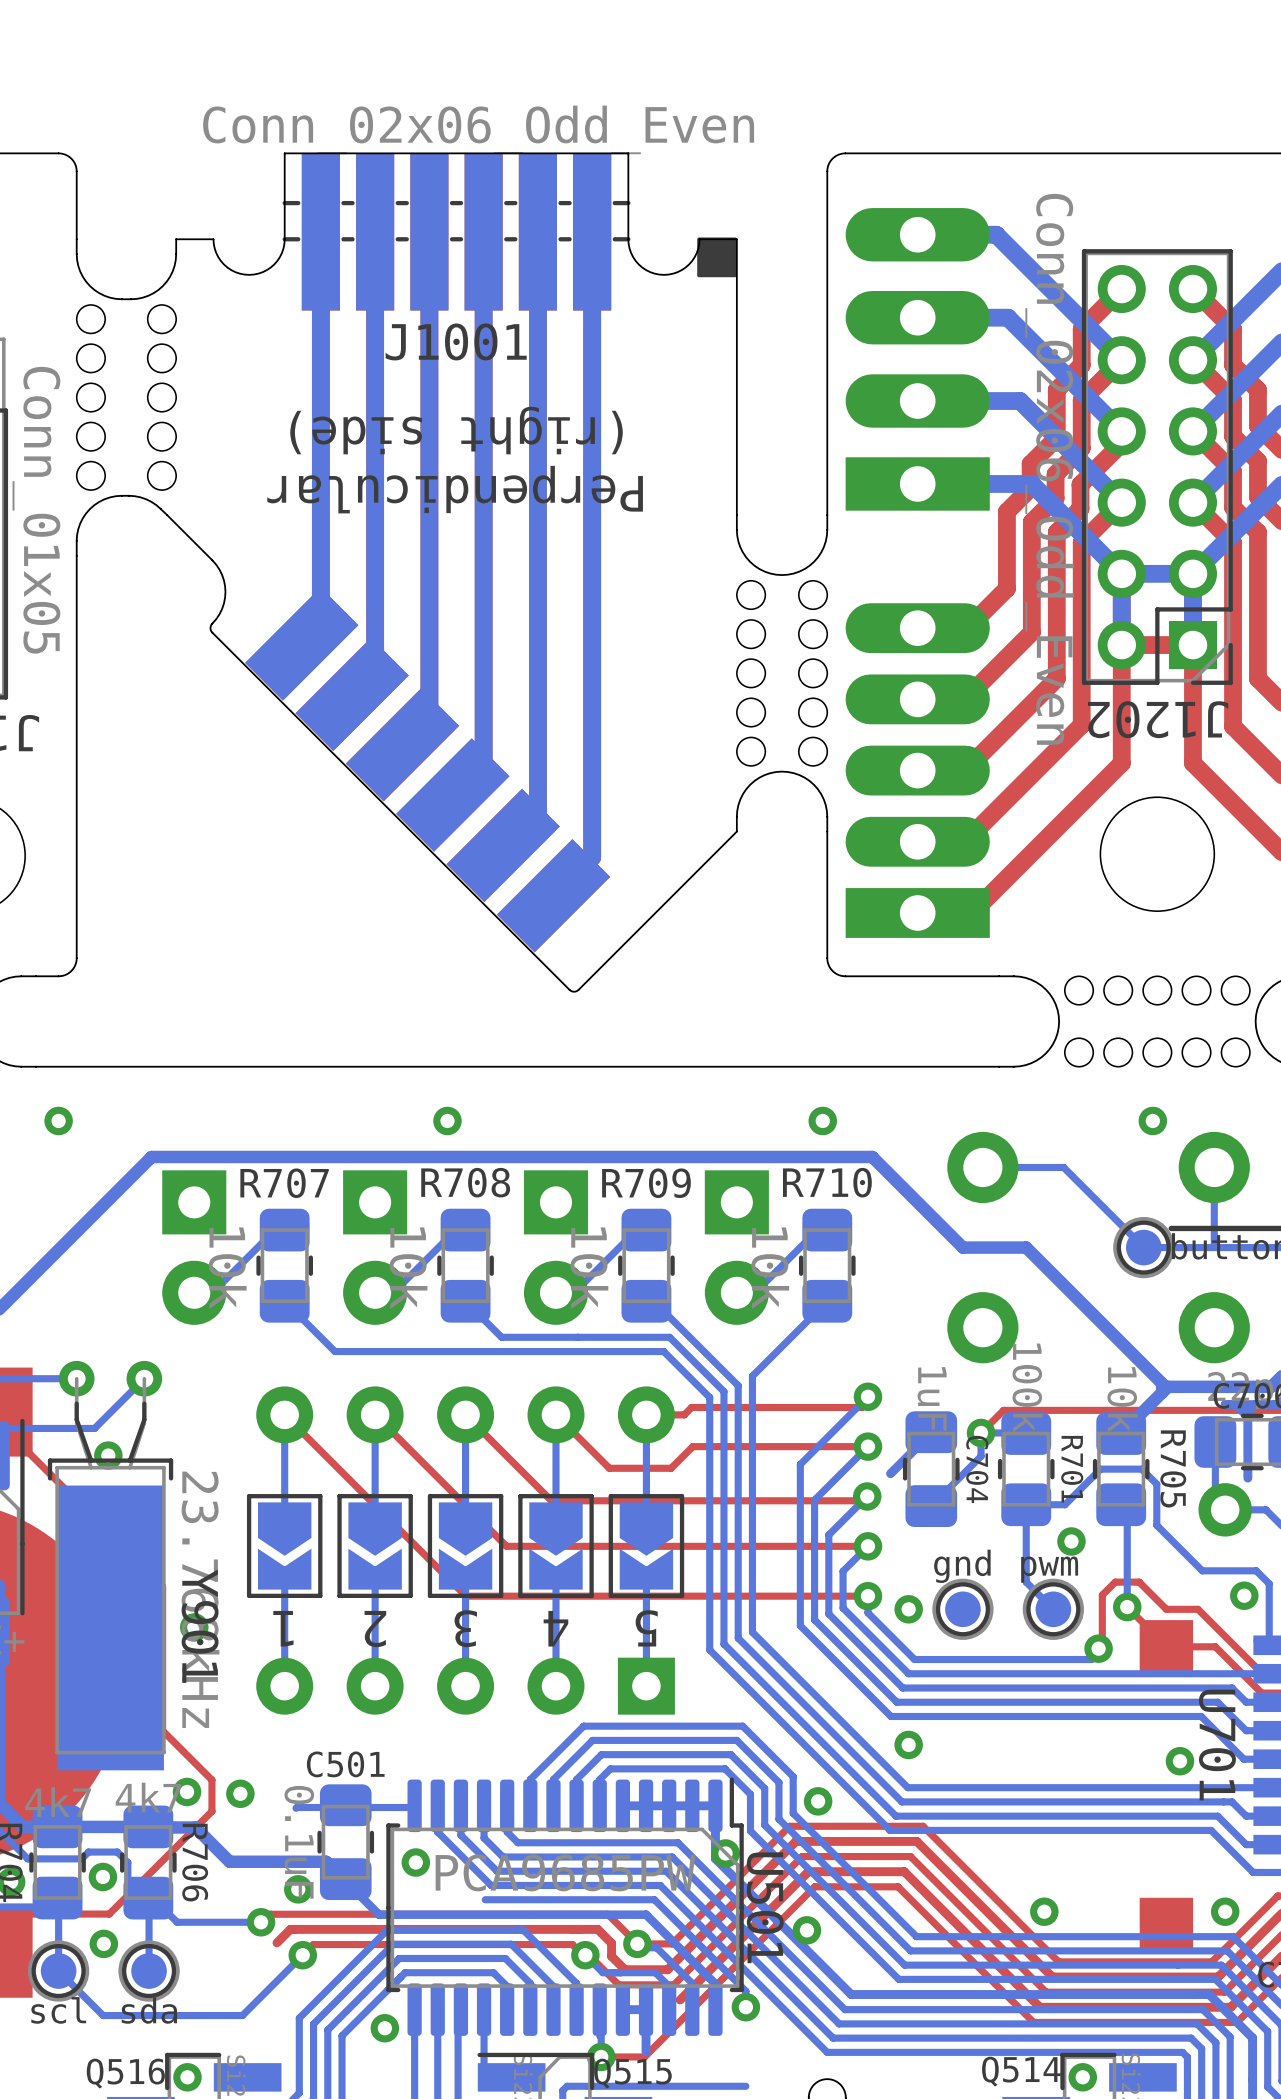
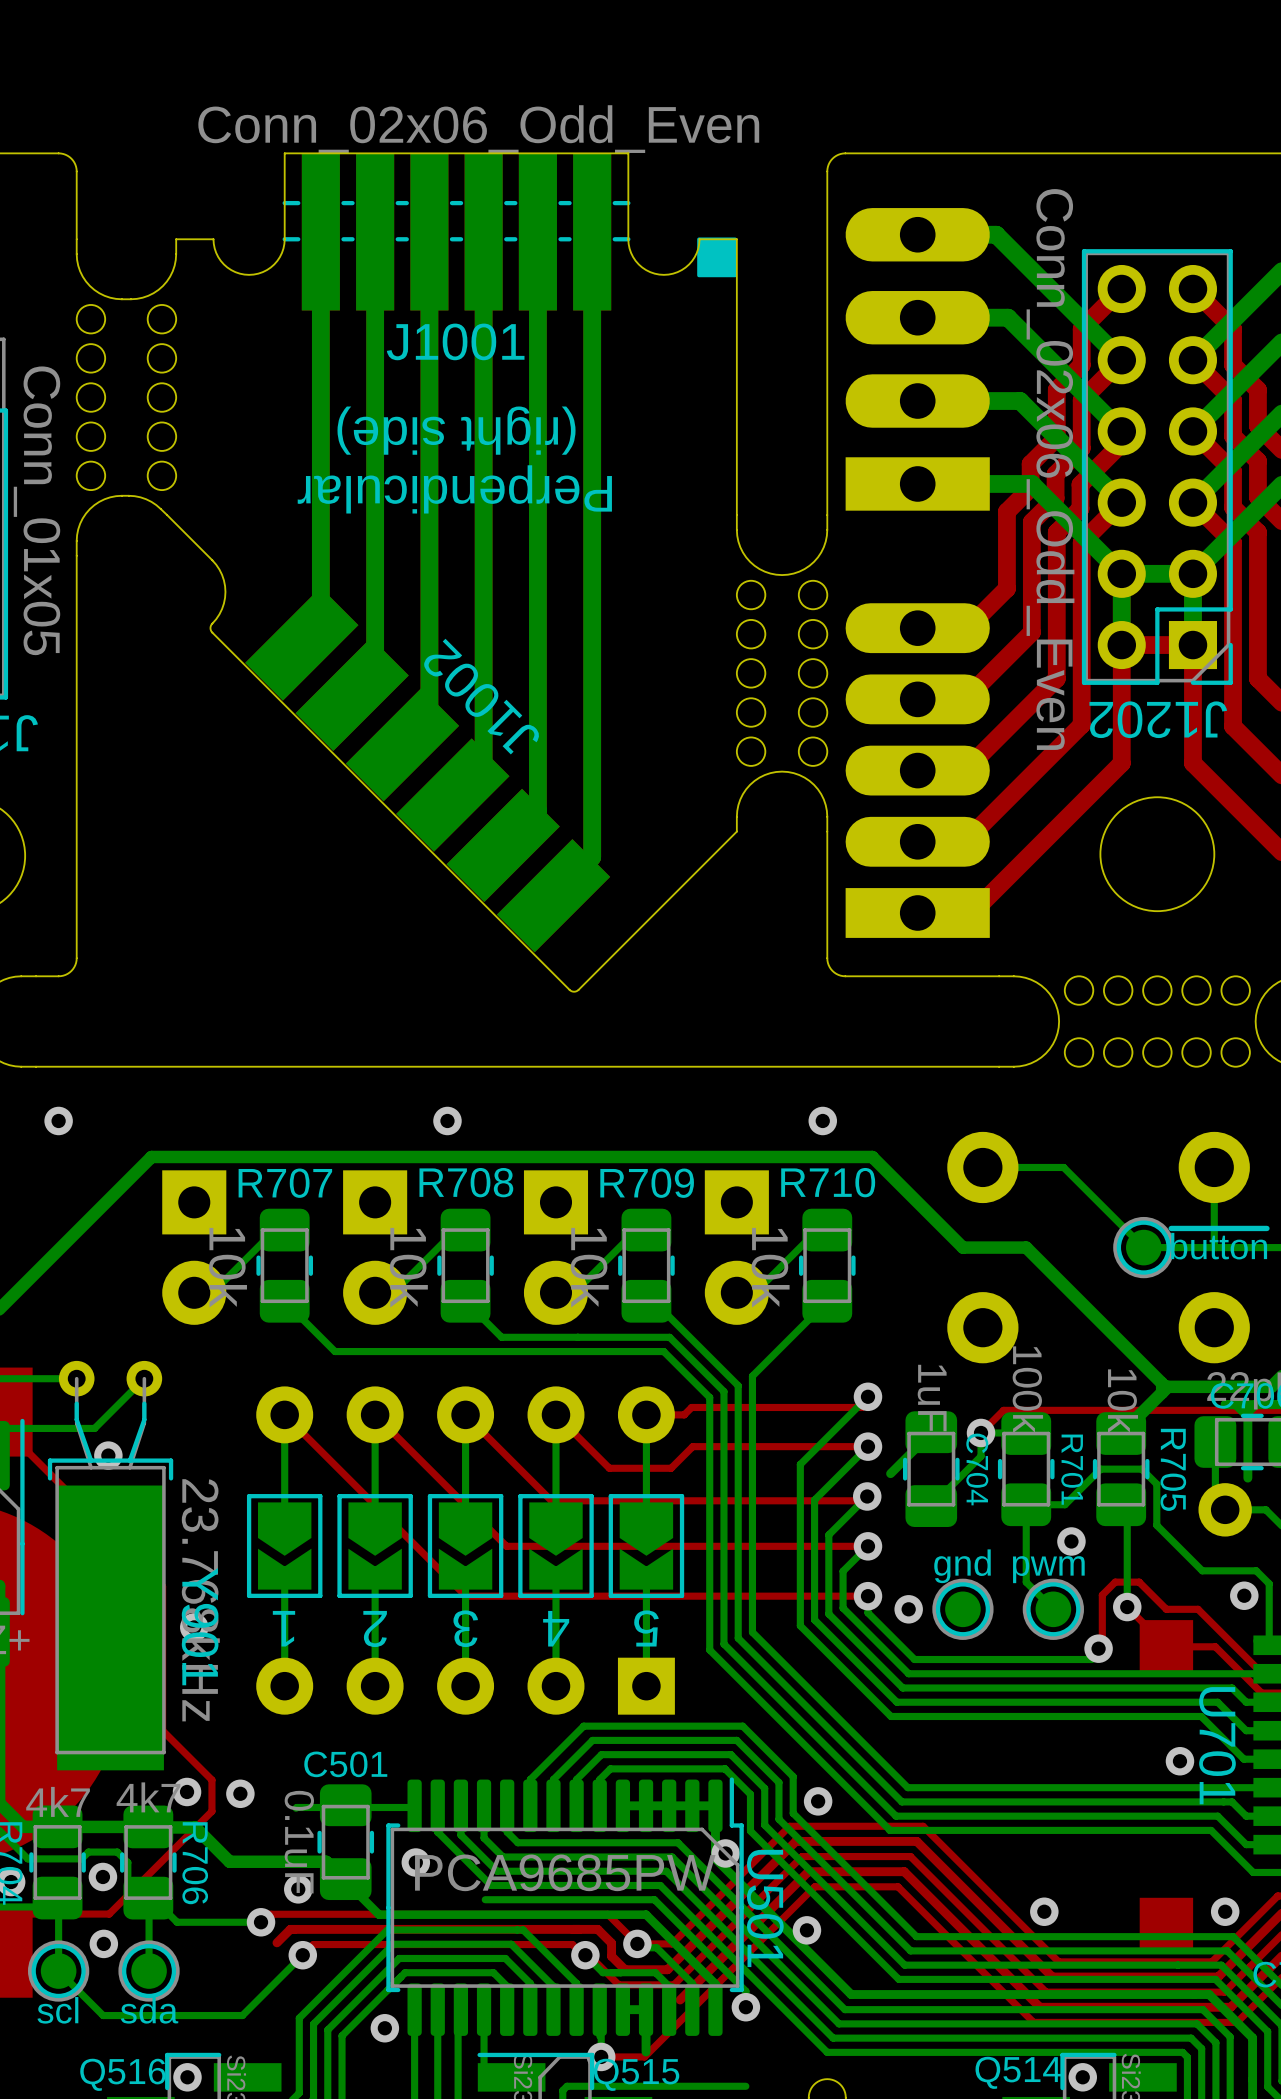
J1002 name: none -> J1002 (482, 696)
via: (1152, 1120) -> none
via: (908, 1744) -> none

